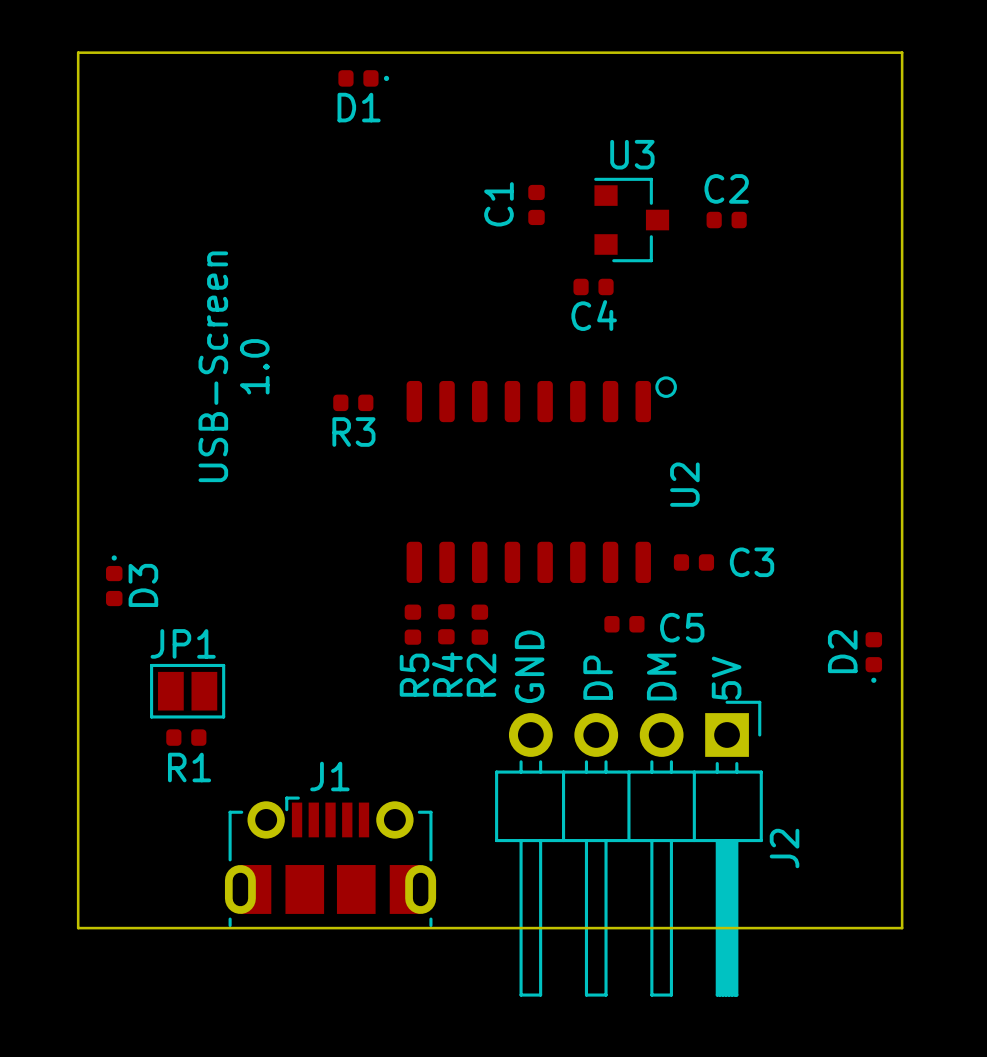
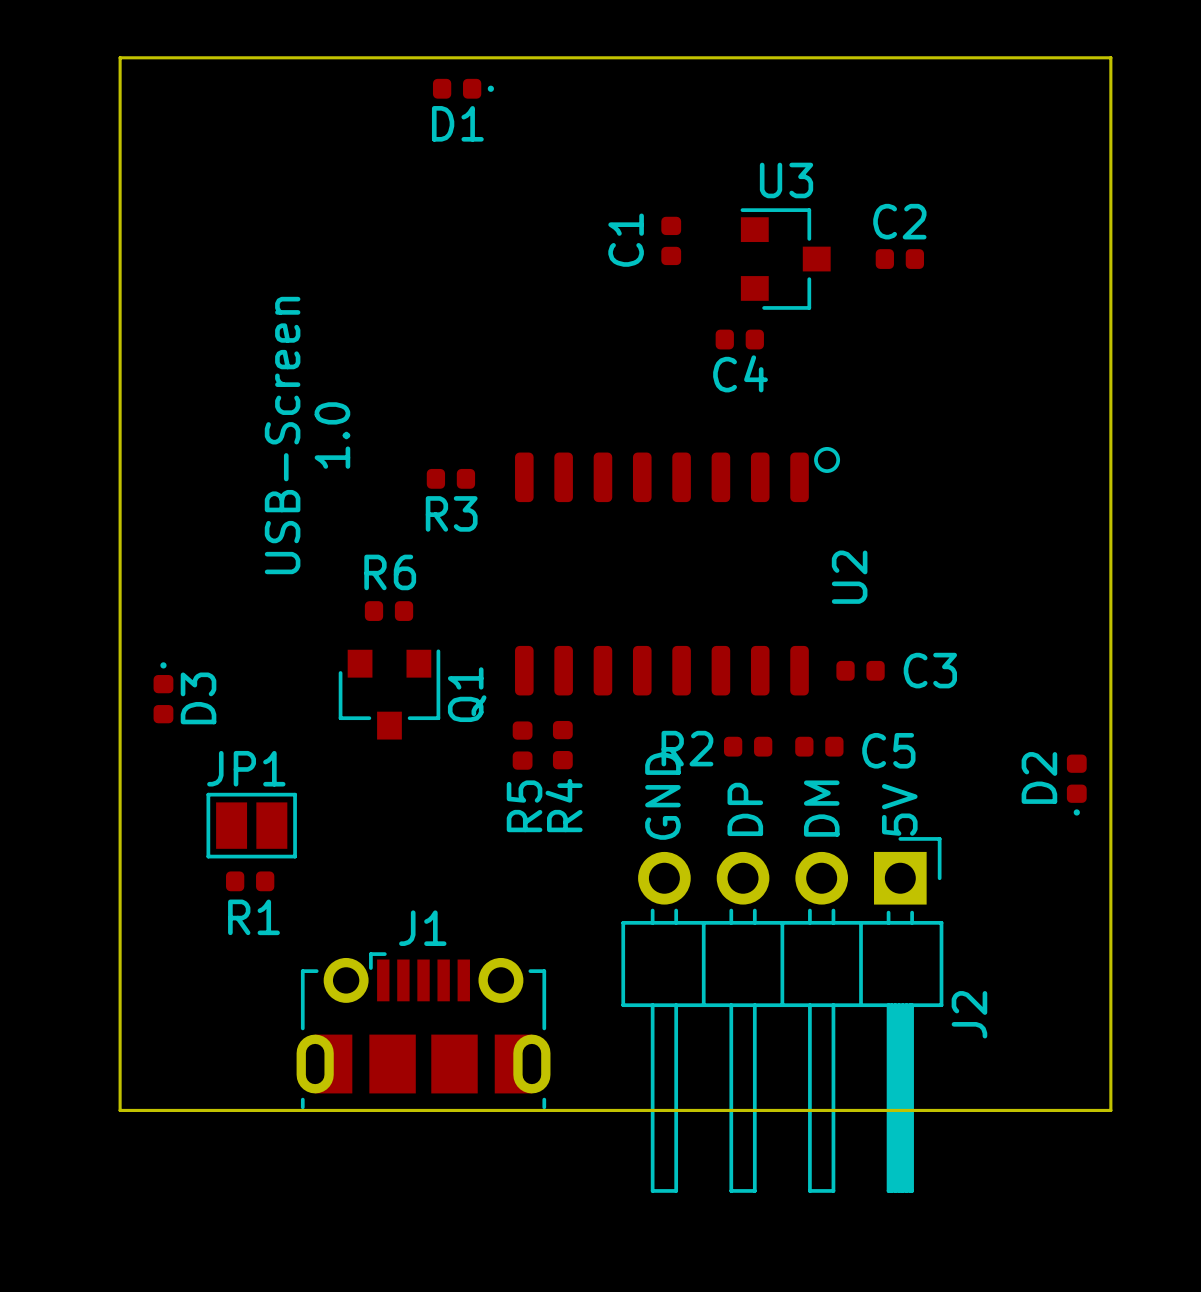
R6: none -> (389, 611)
Q1: none -> (389, 694)
R2 rotation: 0° (479, 624) -> 90° clockwise (748, 746)
R2 position: (479, 624) -> (748, 746)
C5 position: (624, 624) -> (819, 746)

